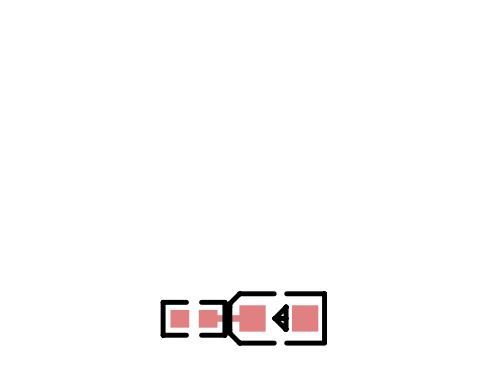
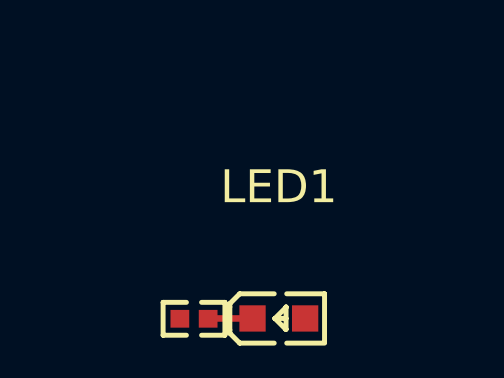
LED1 name: none -> LED1 (278, 185)

